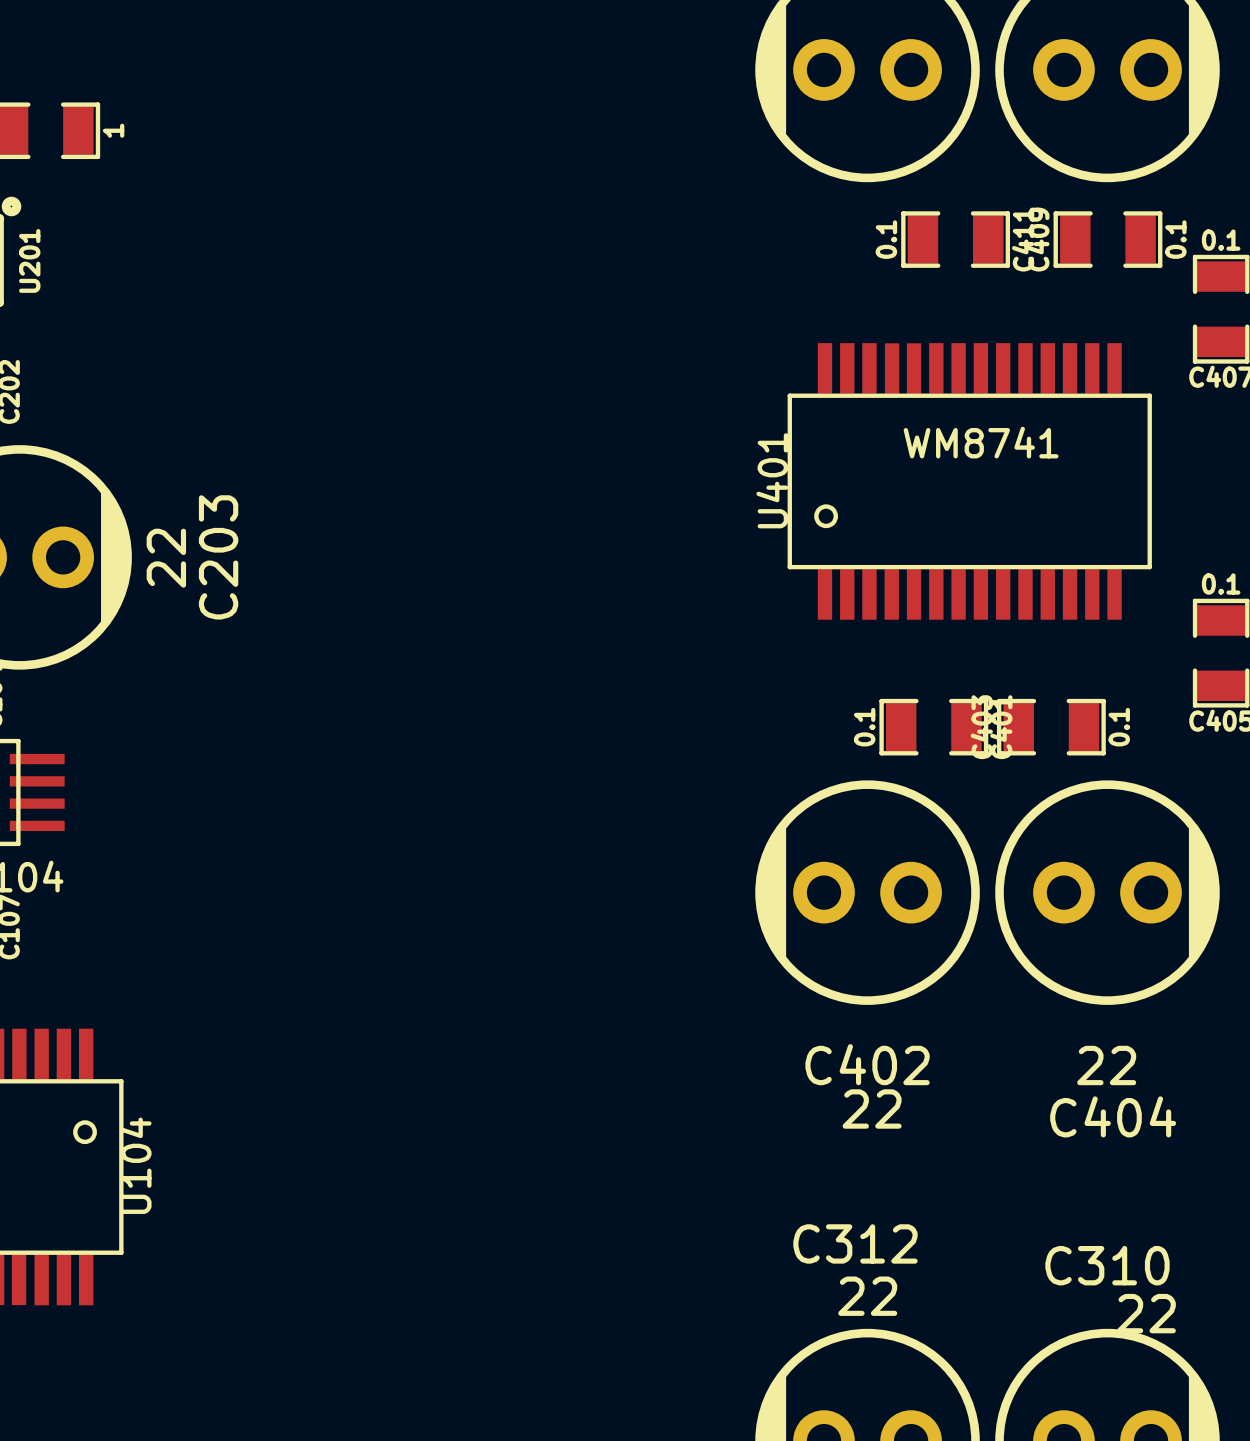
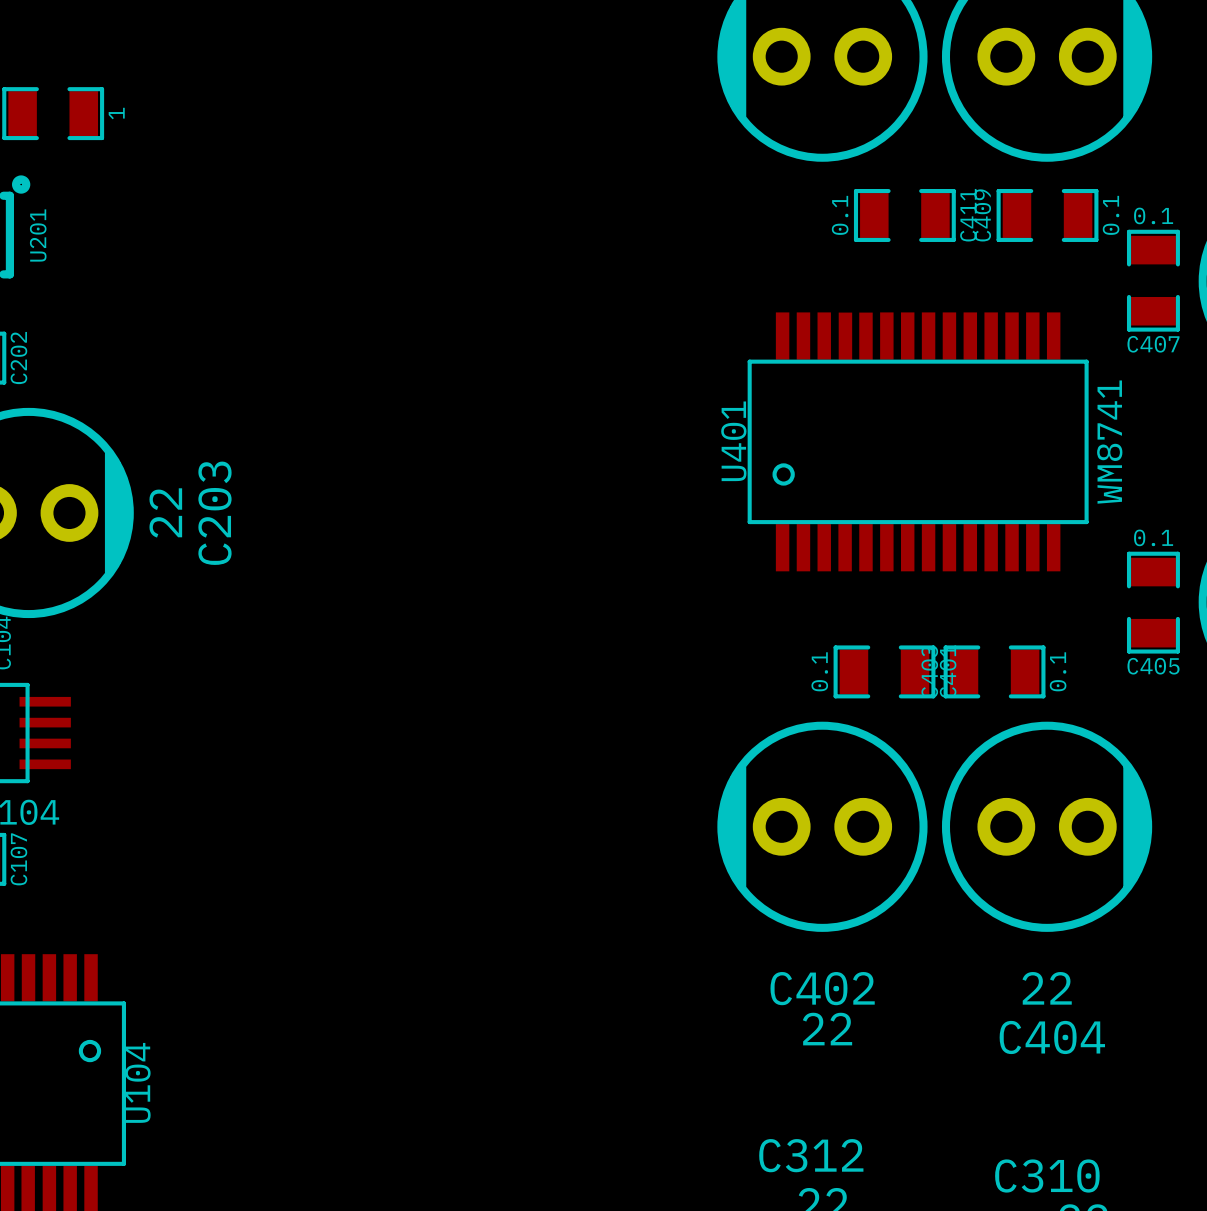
U401 value rotation: 0° (981, 442) -> 90° counterclockwise (1109, 442)
U401 value position: WM8741 (981, 442) -> WM8741 (1109, 442)

